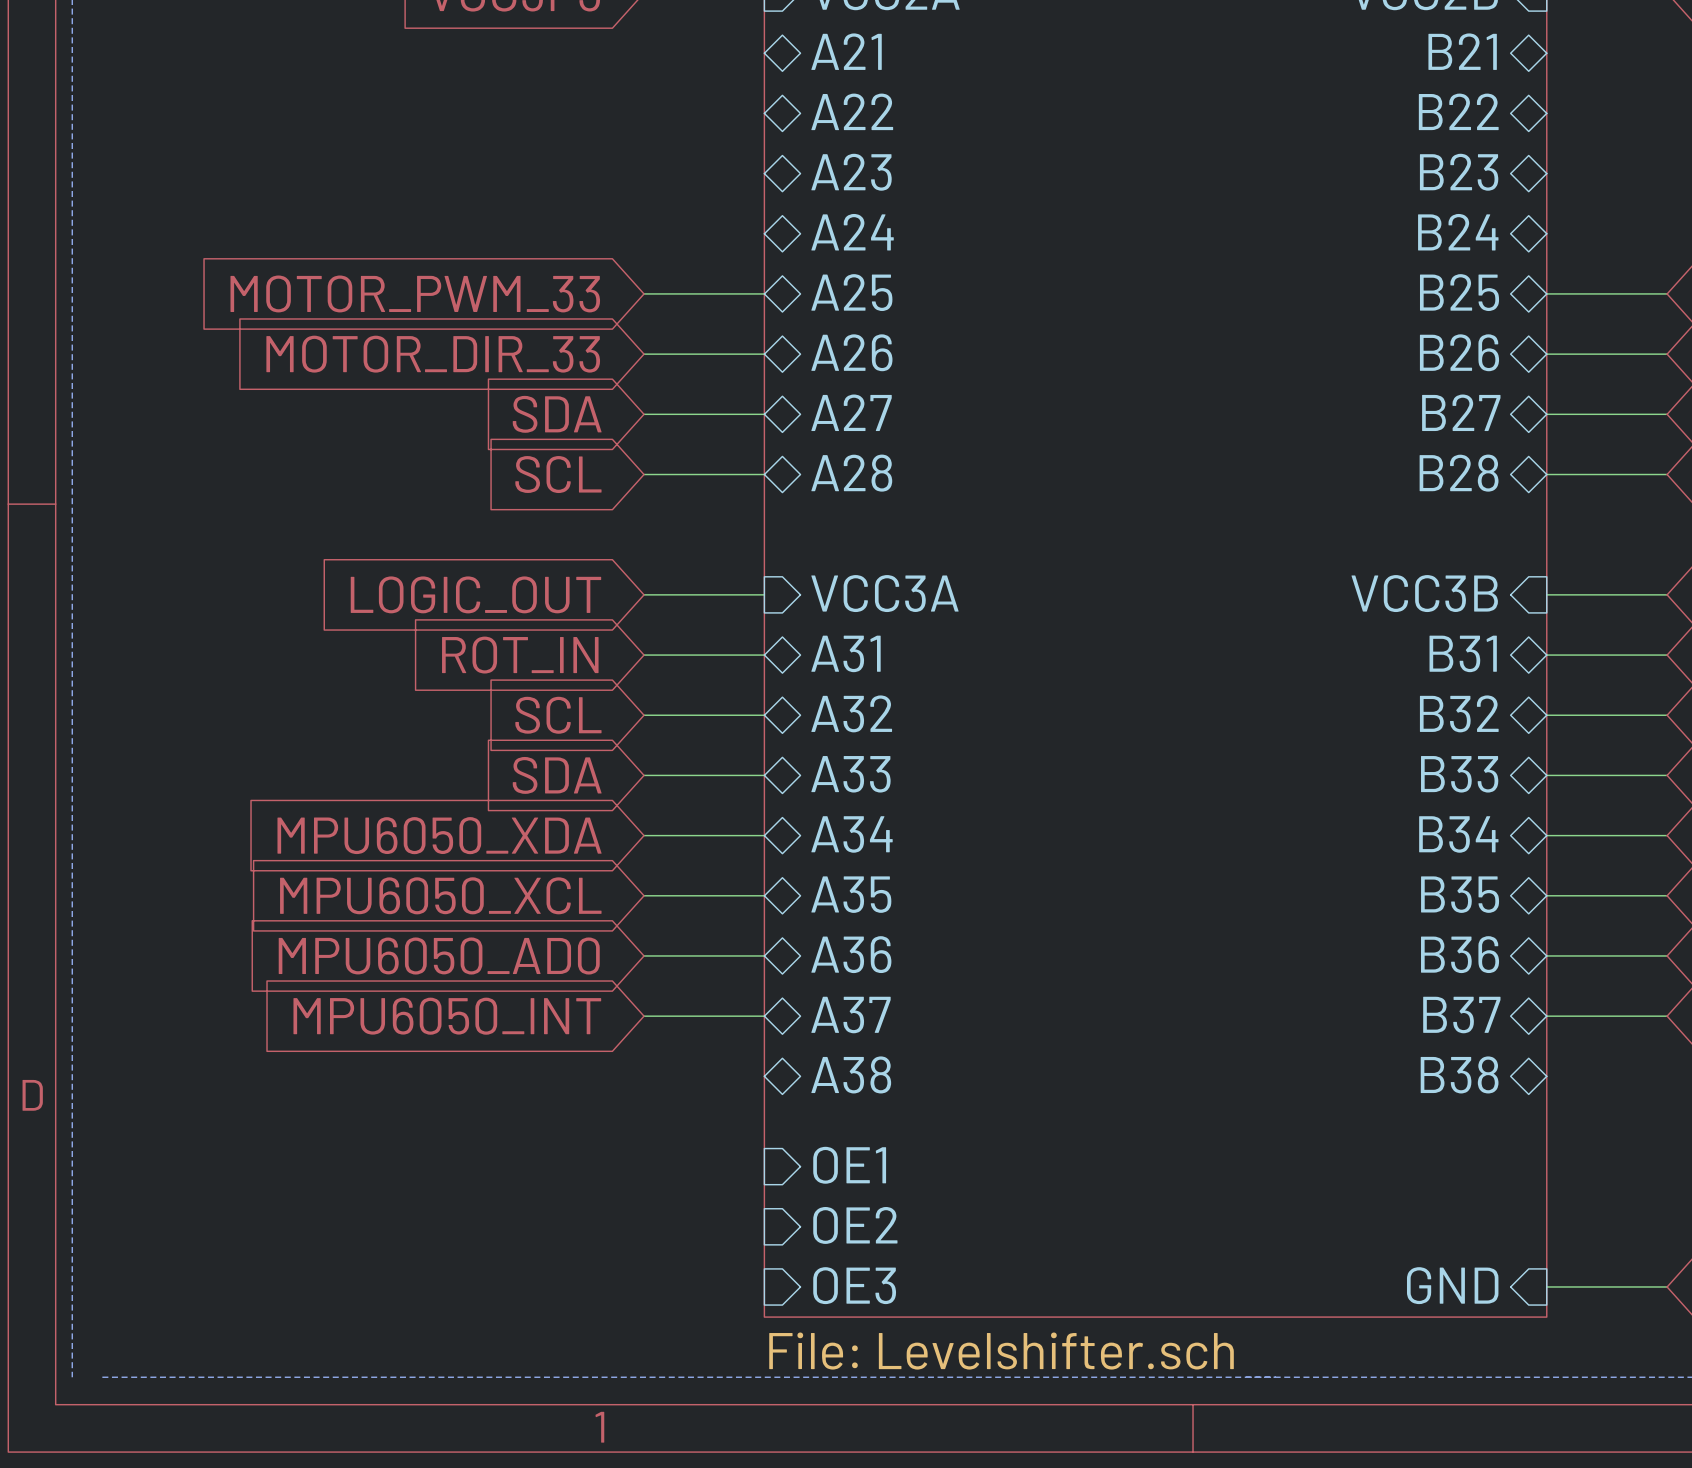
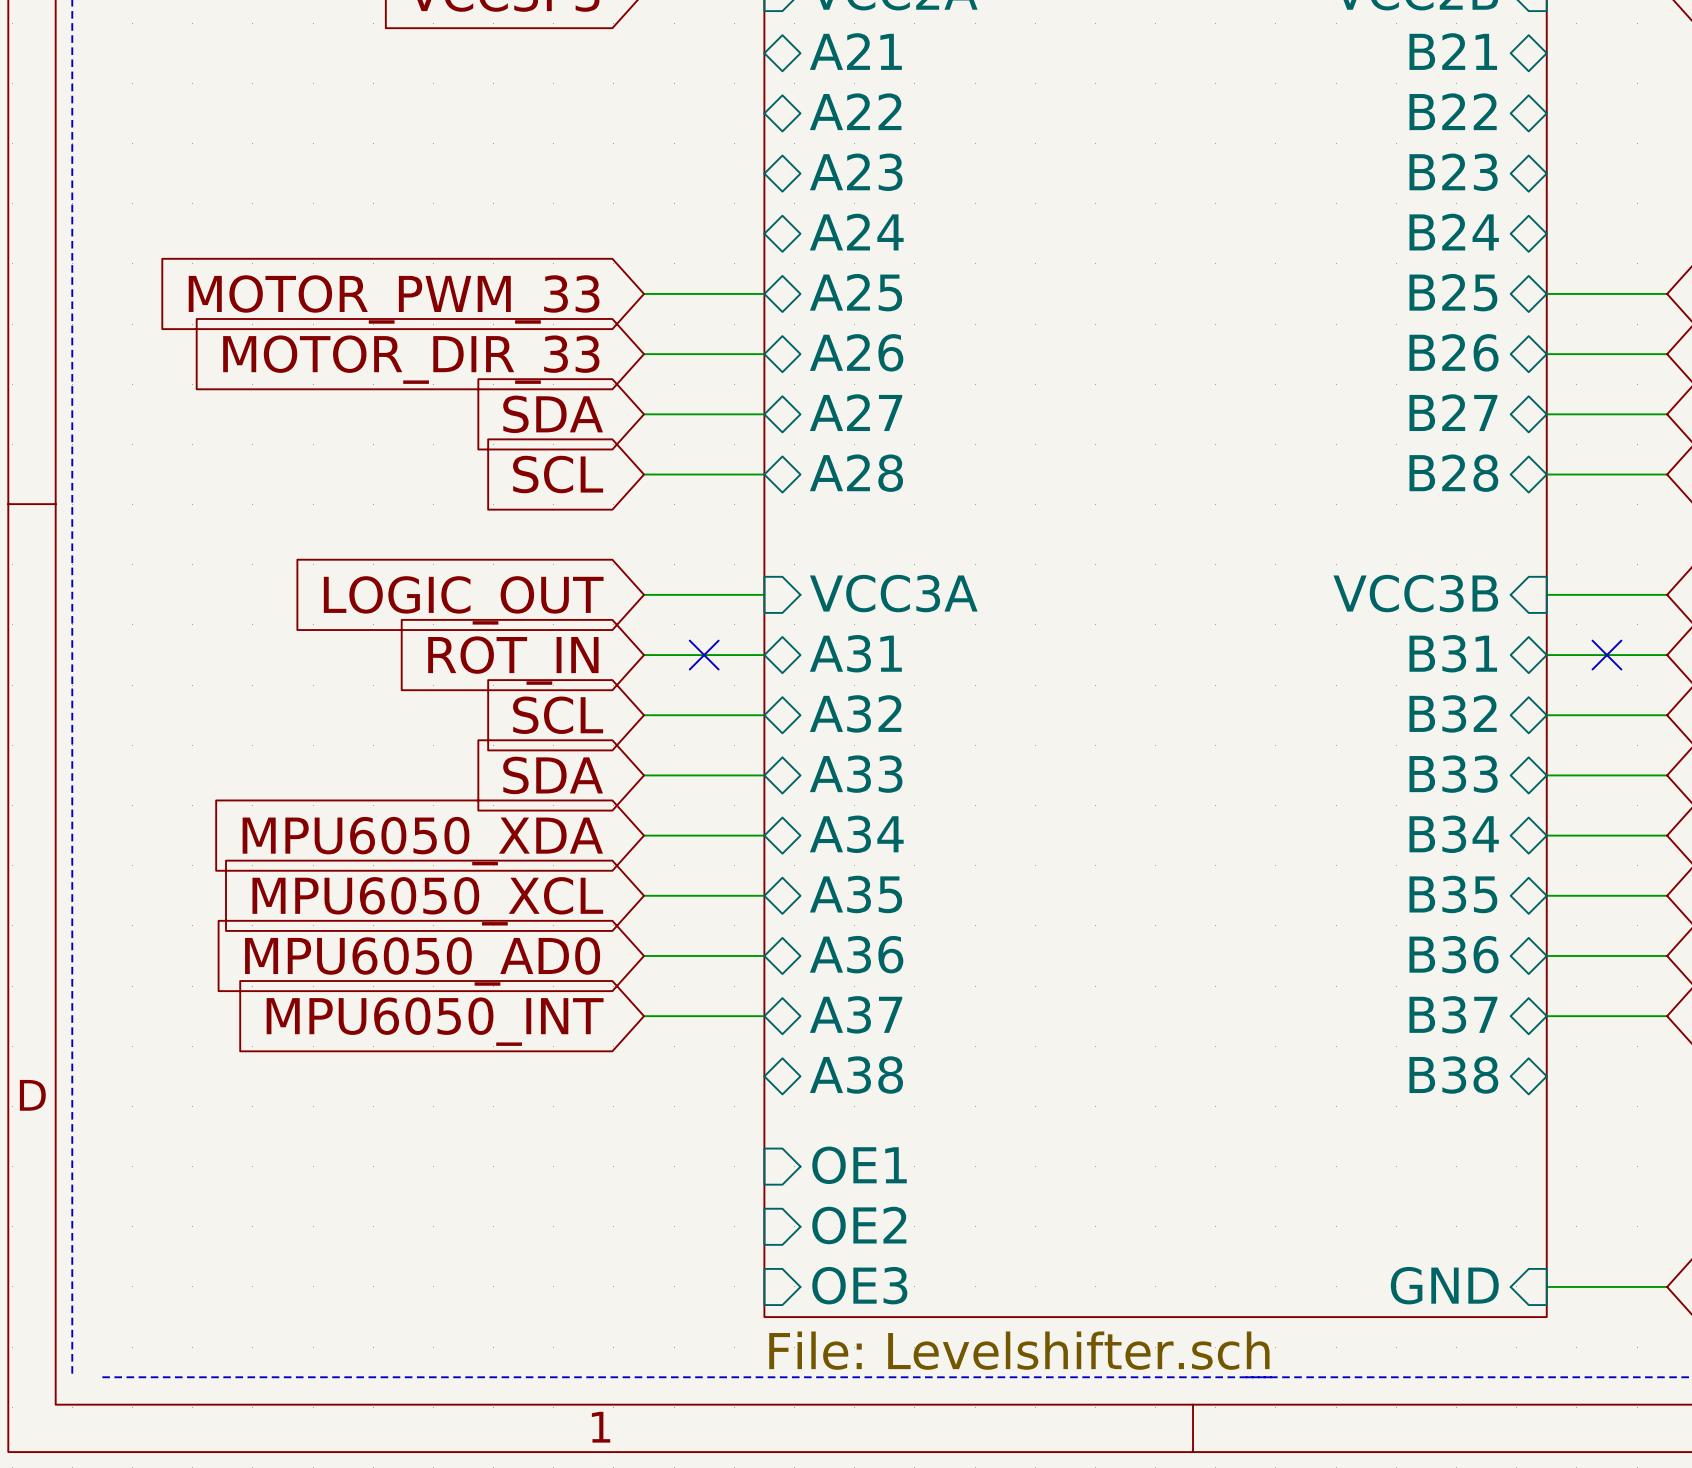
no-connect mark: none -> (704, 655)
no-connect mark: none -> (1606, 655)

